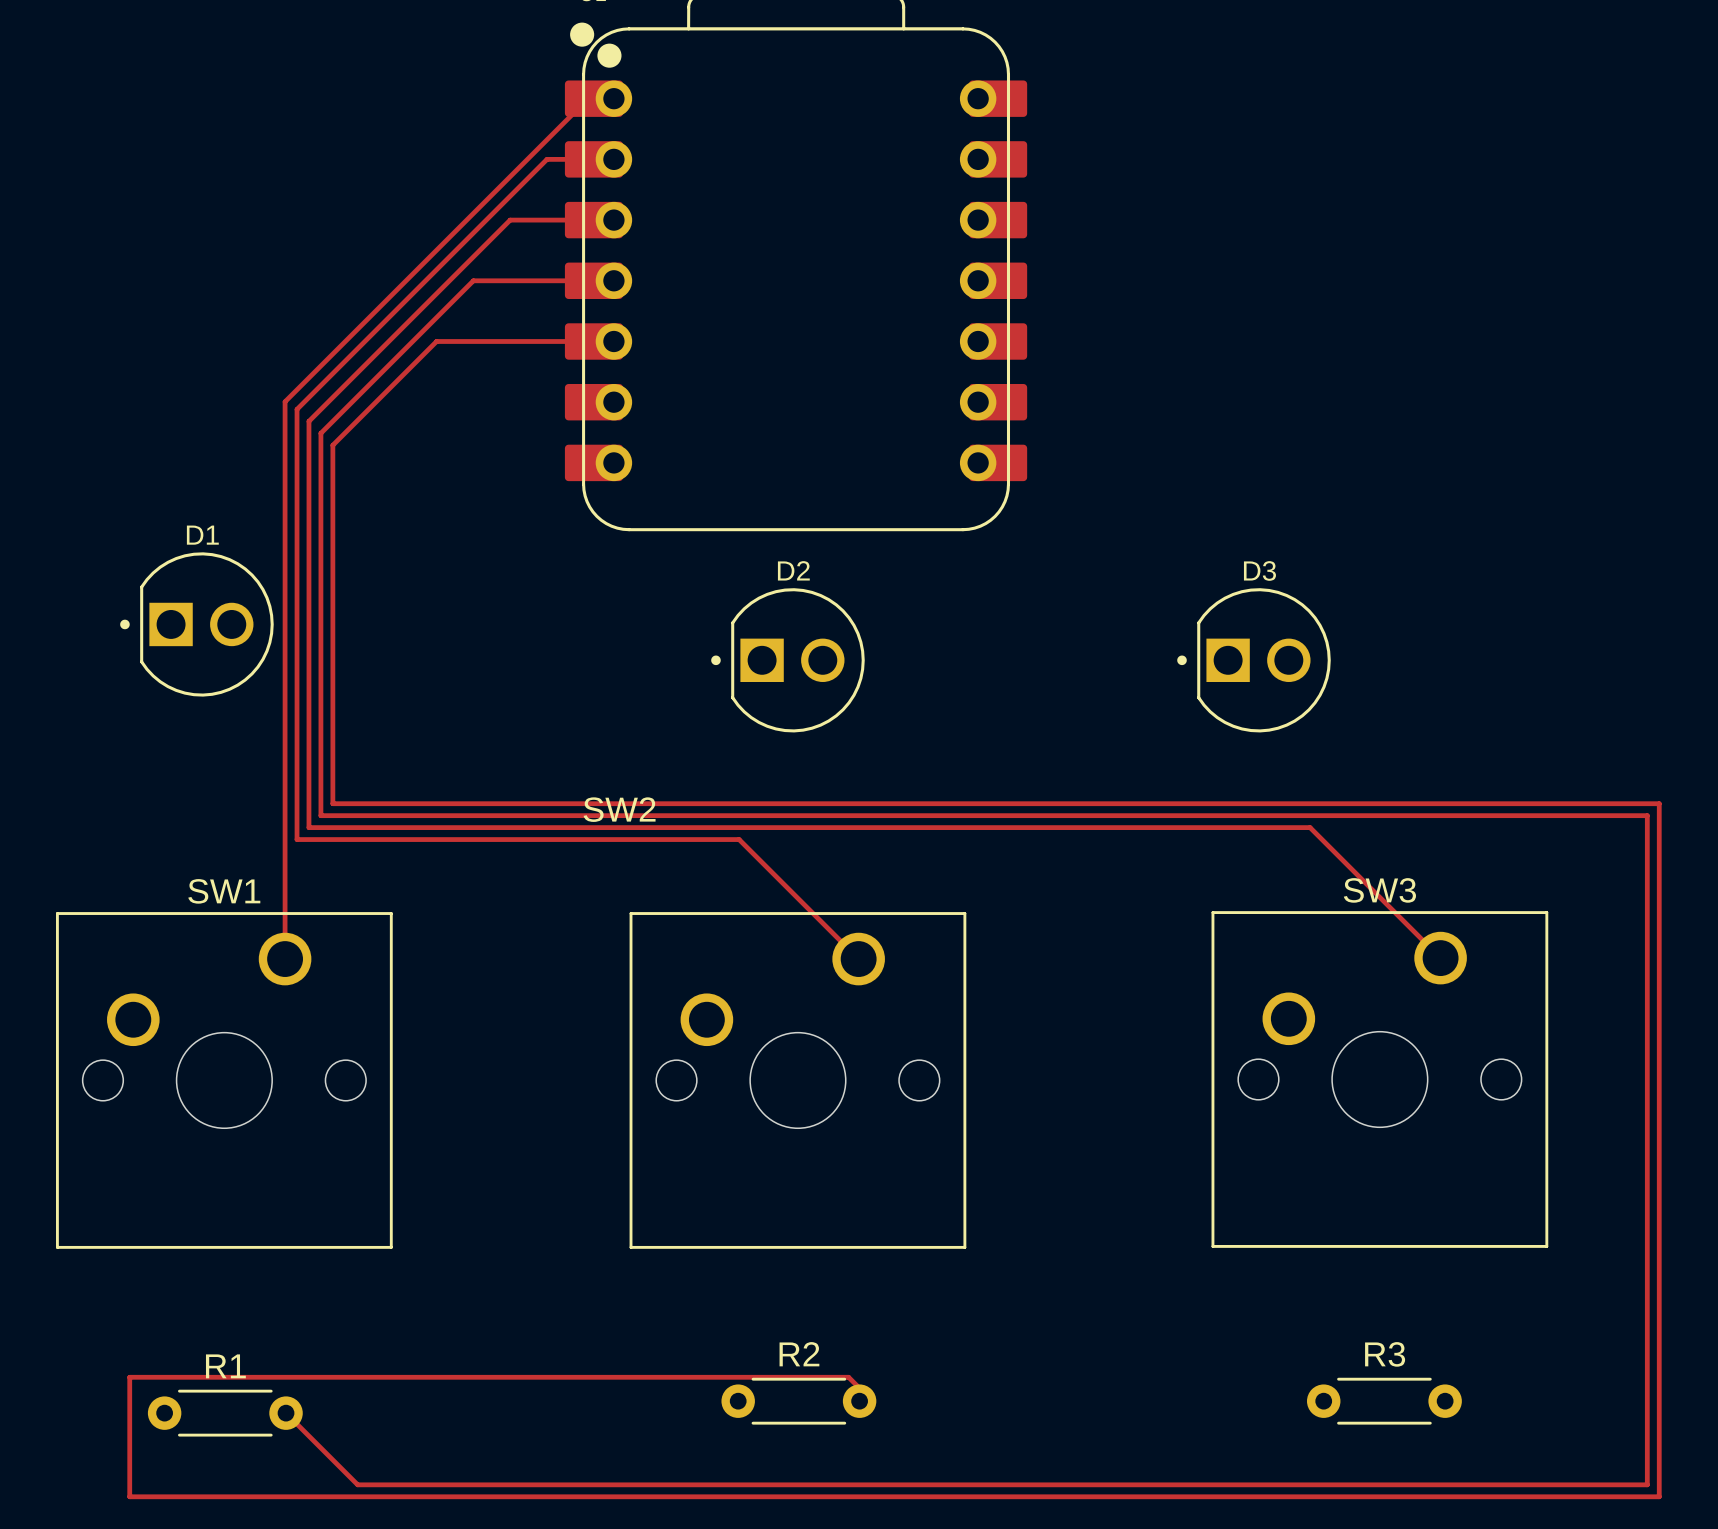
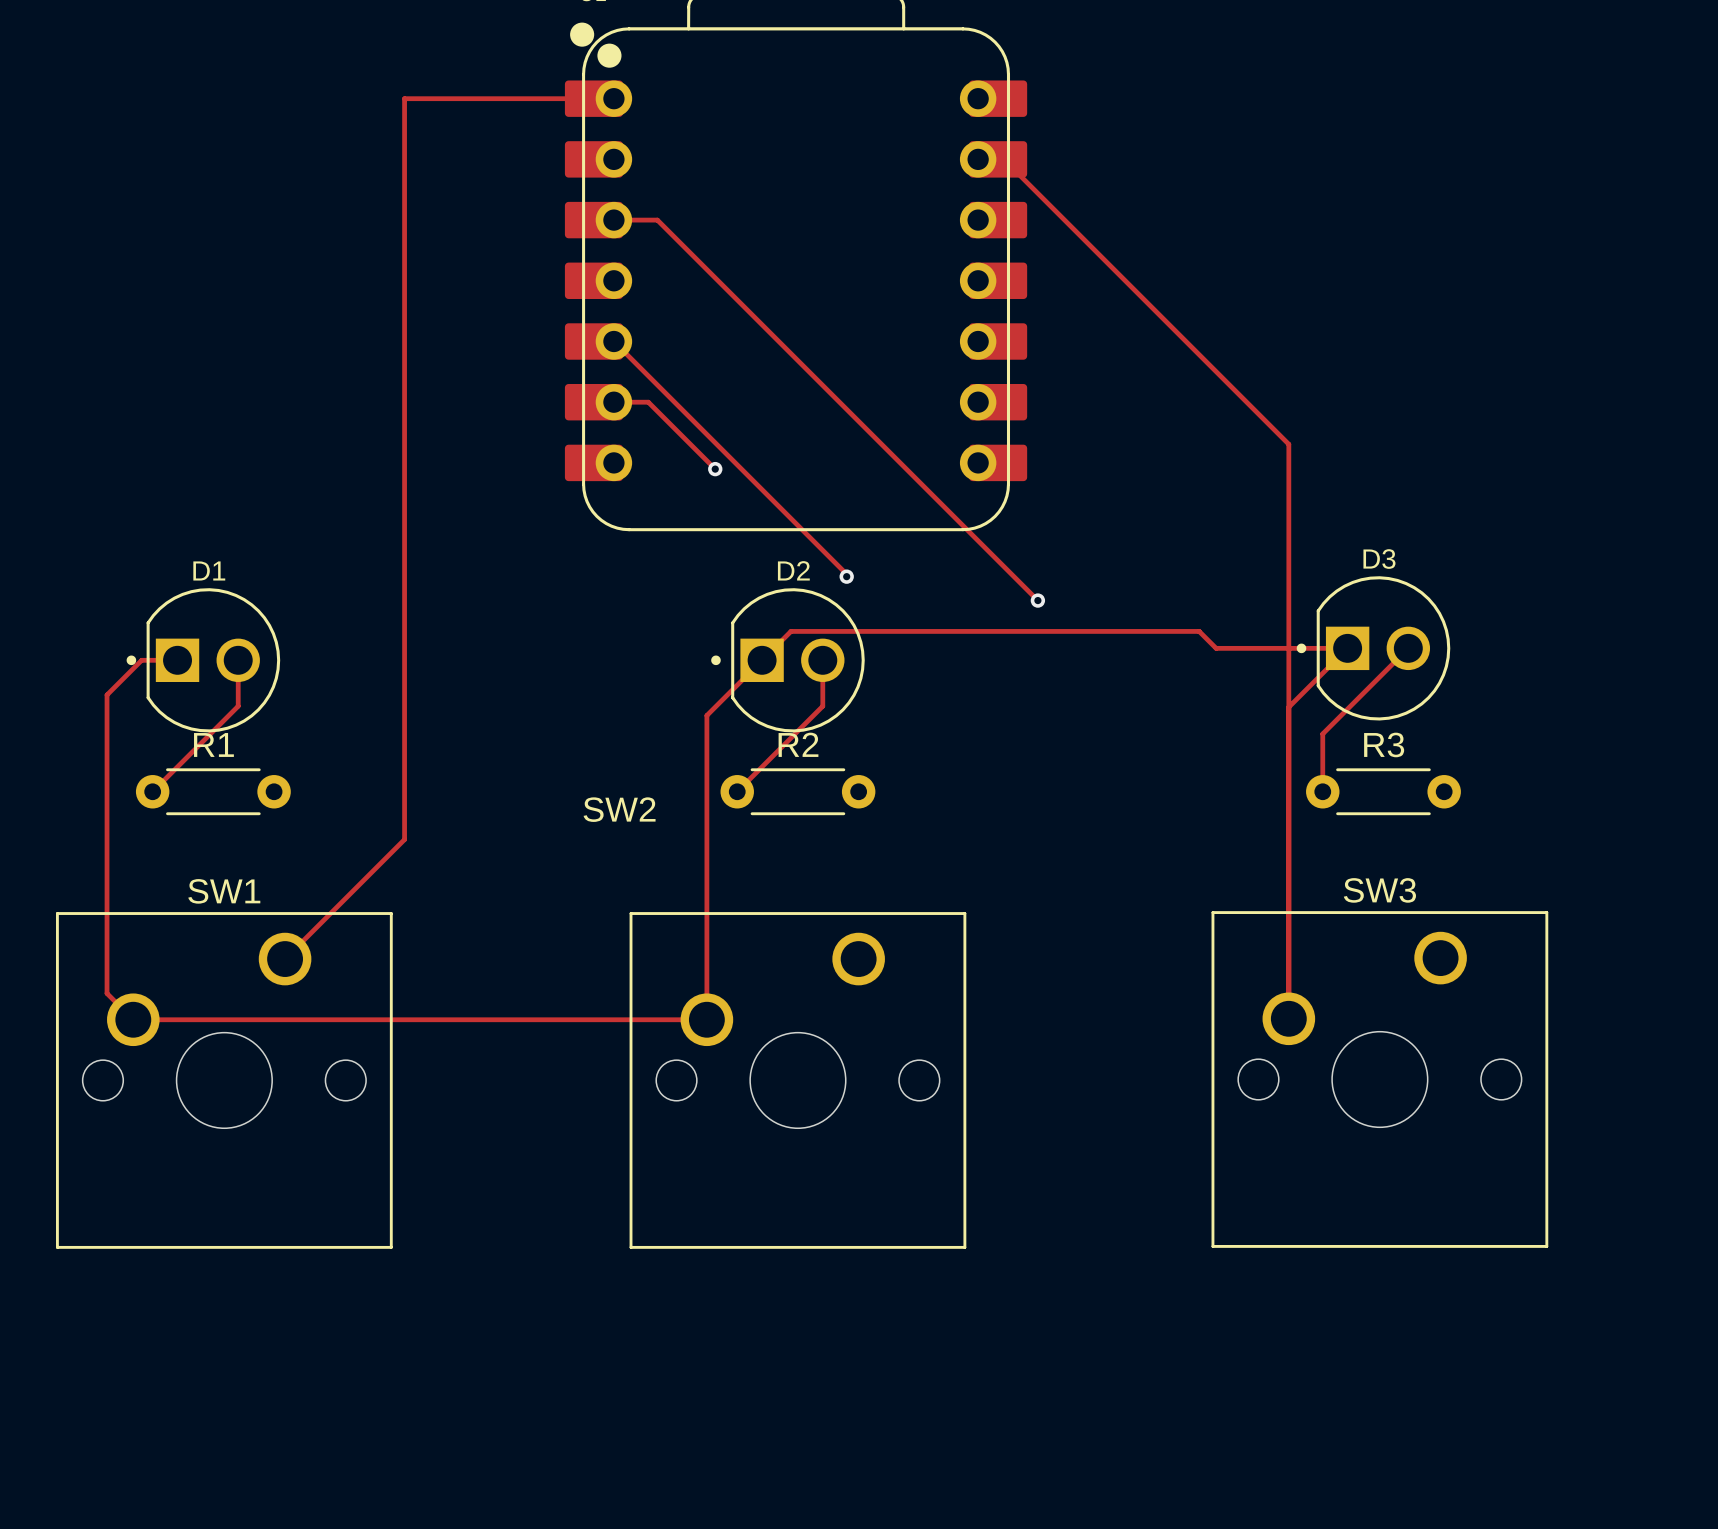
track: (588, 98) (285, 401) (285, 959) -> (588, 98) (404, 98) (404, 839) (285, 959)
track: (613, 159) (547, 159) (297, 409) (297, 839) (739, 839) (858, 959) -> none
track: none -> (978, 159) (1003, 159) (1288, 444) (1288, 1018)
track: (613, 220) (510, 220) (308, 421) (308, 827) (1310, 827) (1440, 958) -> (613, 220) (657, 220) (1037, 600)
track: (613, 280) (473, 280) (320, 433) (320, 815) (1647, 815) (1647, 1484) (357, 1484) (286, 1413) -> none
track: (613, 341) (436, 341) (332, 445) (332, 803) (1659, 803) (1659, 1496) (129, 1496) (129, 1377) (848, 1377) (859, 1388) (859, 1401) -> (613, 341) (846, 574) (846, 576)
track: none -> (613, 402) (648, 402) (715, 469)
via: none -> (715, 469)
via: none -> (846, 576)
via: none -> (1037, 600)
D1 position: (196, 624) -> (203, 660)
track: none -> (1408, 648) (1322, 733) (1322, 791)
track: none -> (177, 660) (141, 660) (107, 694) (107, 993) (133, 1019) (706, 1019) (706, 715) (790, 631) (1199, 631) (1216, 648) (1347, 648) (1288, 707)
track: none -> (238, 660) (238, 706) (152, 791)
track: none -> (822, 660) (822, 706) (737, 791)
D3 position: (1254, 660) -> (1373, 648)
R2 position: (798, 1401) -> (797, 791)
R3 position: (1384, 1401) -> (1383, 791)
R1 position: (225, 1413) -> (213, 791)

